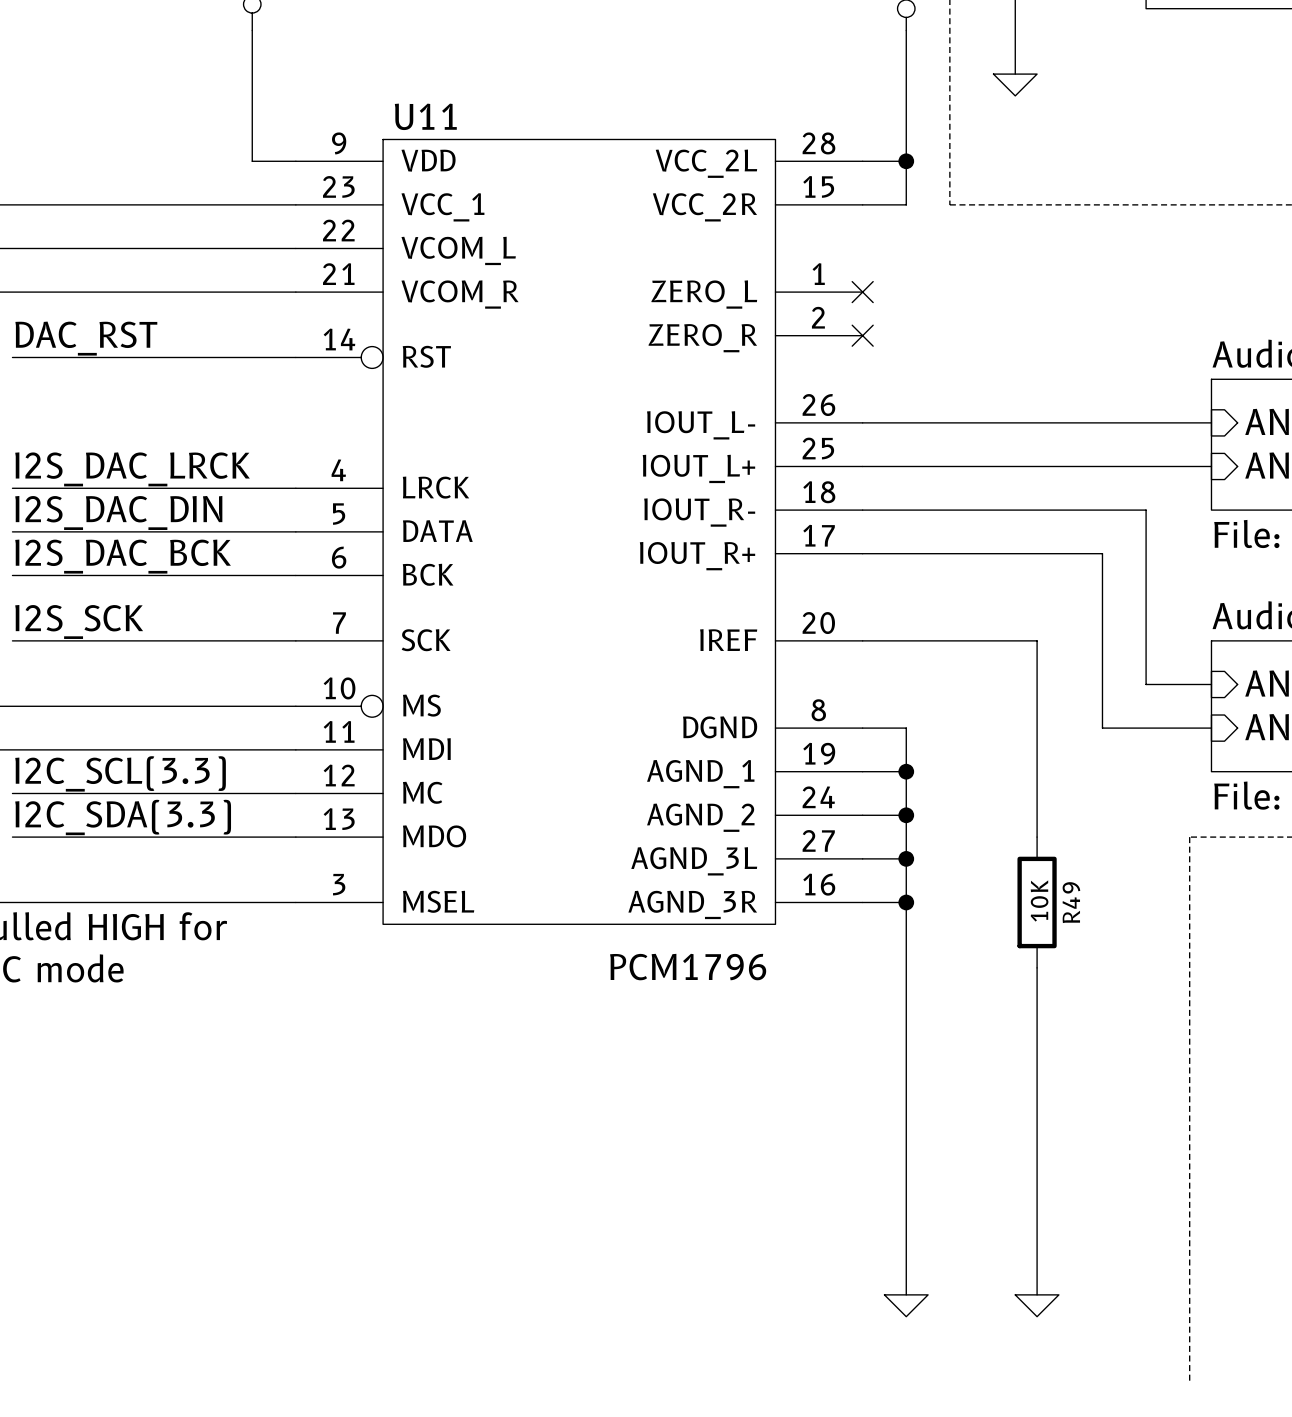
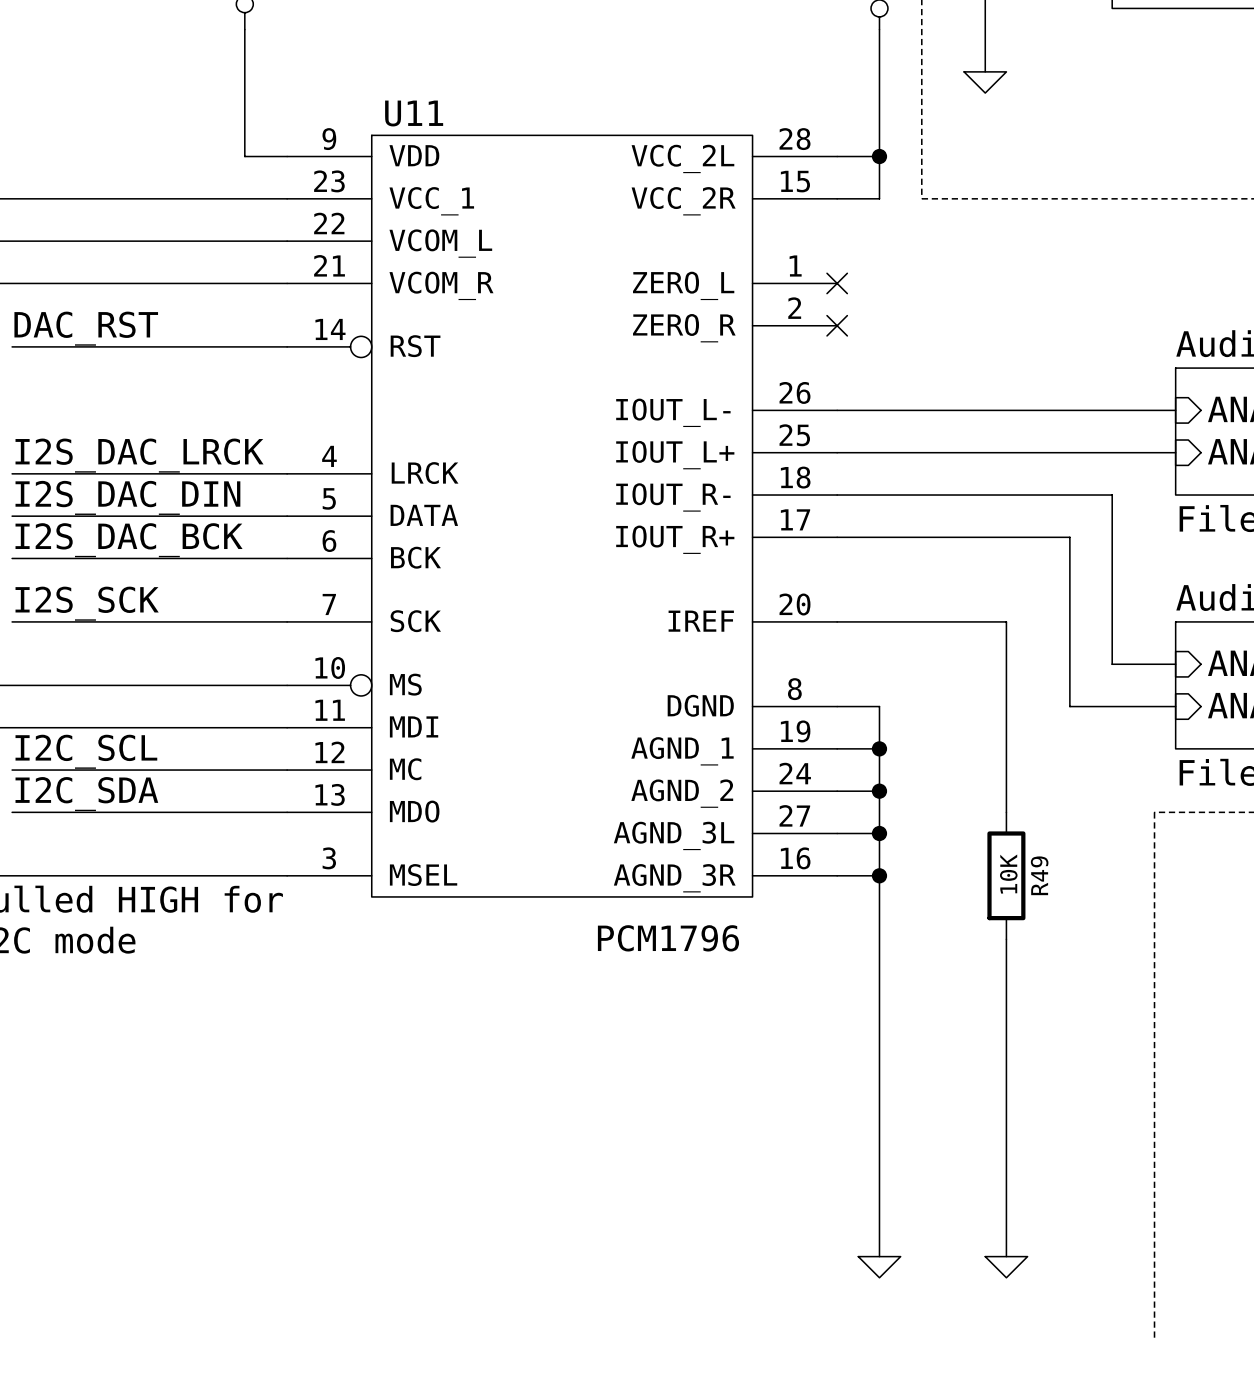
label: I2C_SCL(3.3) (120, 773) -> I2C_SCL (86, 751)
label: I2C_SDA(3.3) (123, 817) -> I2C_SDA (86, 794)

